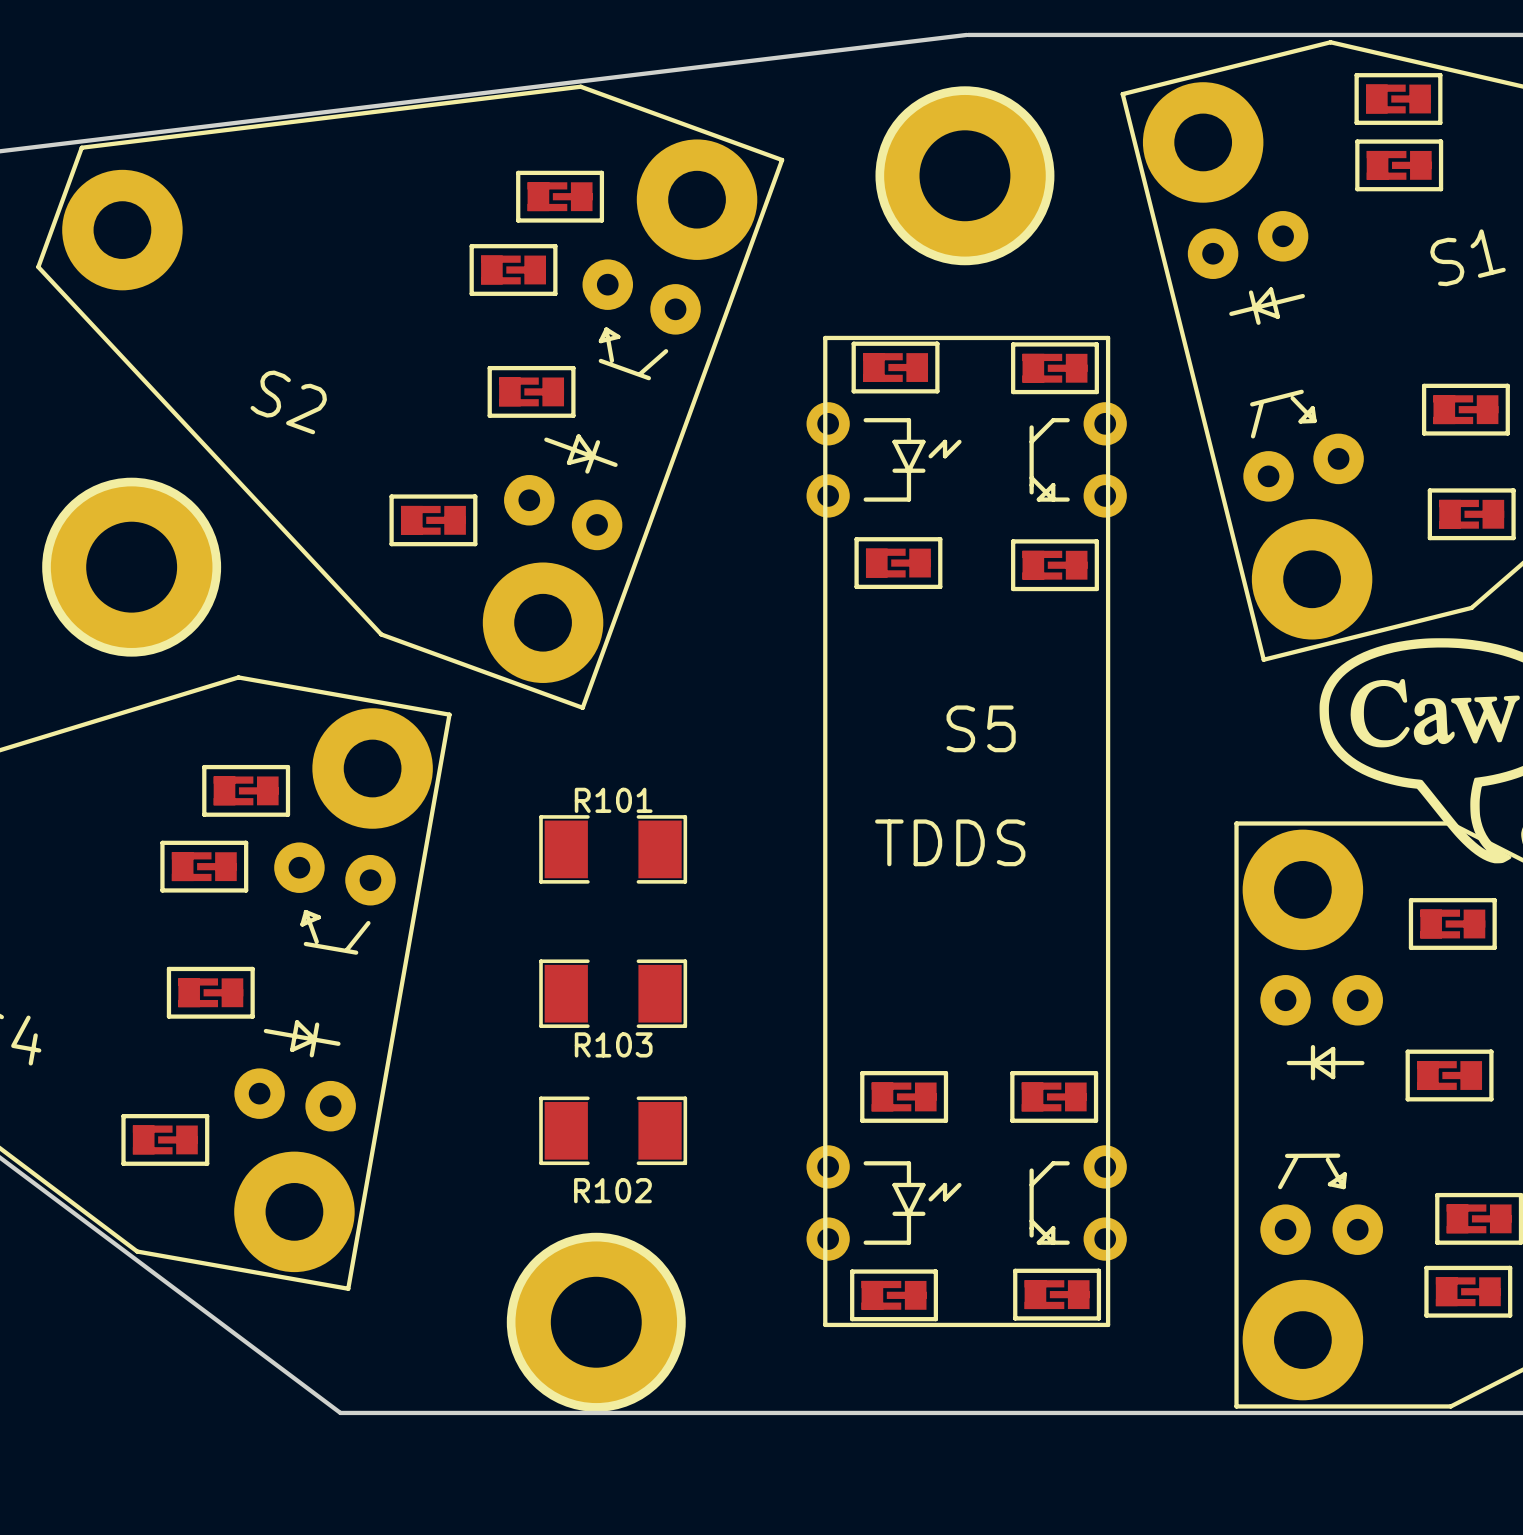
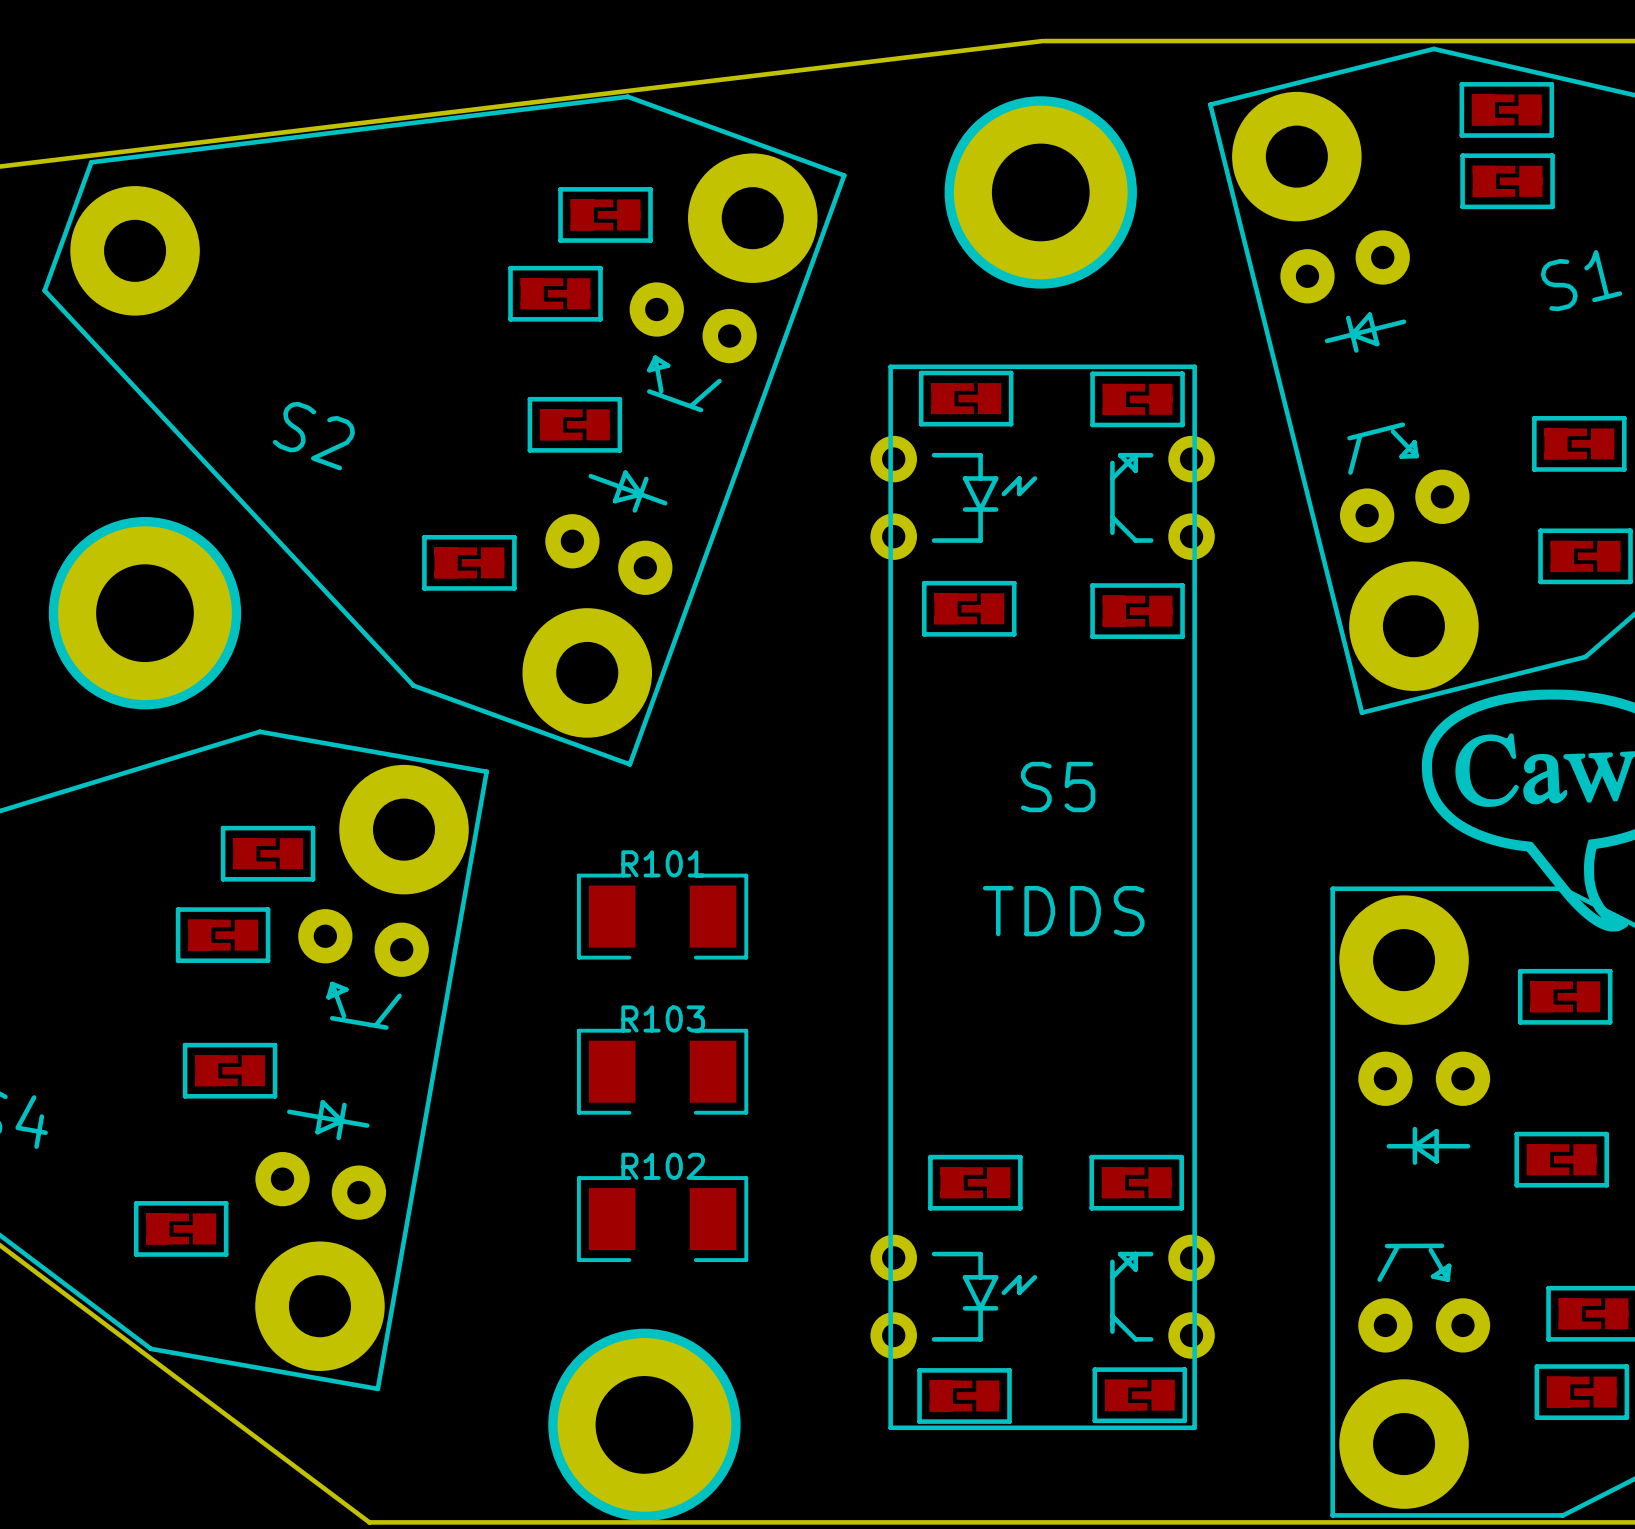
S5 footprint: [806, 335, 1127, 1328] -> [870, 364, 1215, 1431]
R101 footprint: [539, 815, 688, 884] -> [577, 873, 749, 960]
S5 value position: TDDS (950, 842) -> TDDS (1063, 911)
R103 footprint: [539, 959, 688, 1028] -> [577, 1028, 749, 1115]
R103 name position: R103 (613, 1044) -> R103 (663, 1018)
R102 footprint: [539, 1096, 688, 1166] -> [577, 1176, 749, 1263]
R102 name position: R102 (612, 1190) -> R102 (663, 1166)

